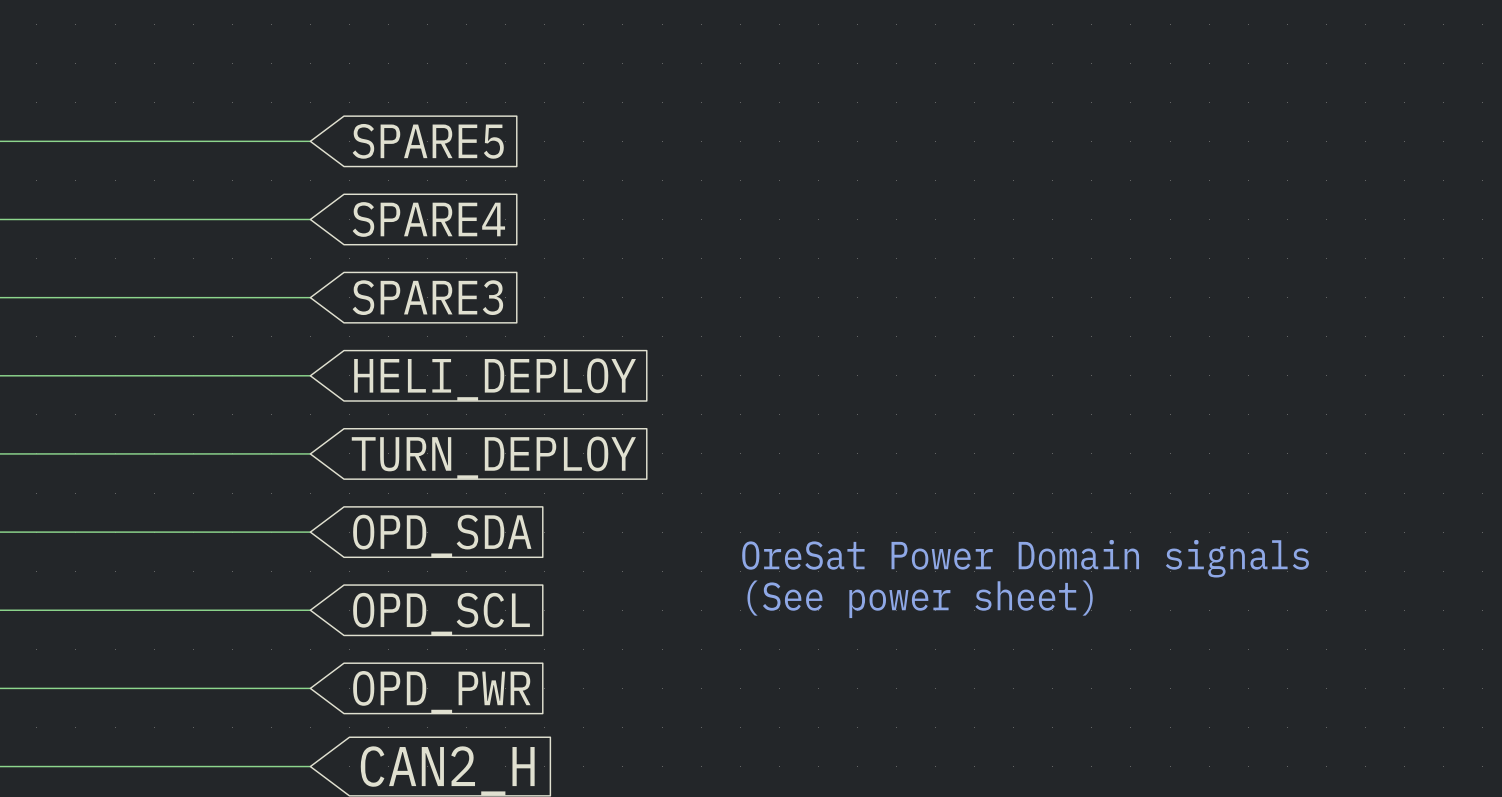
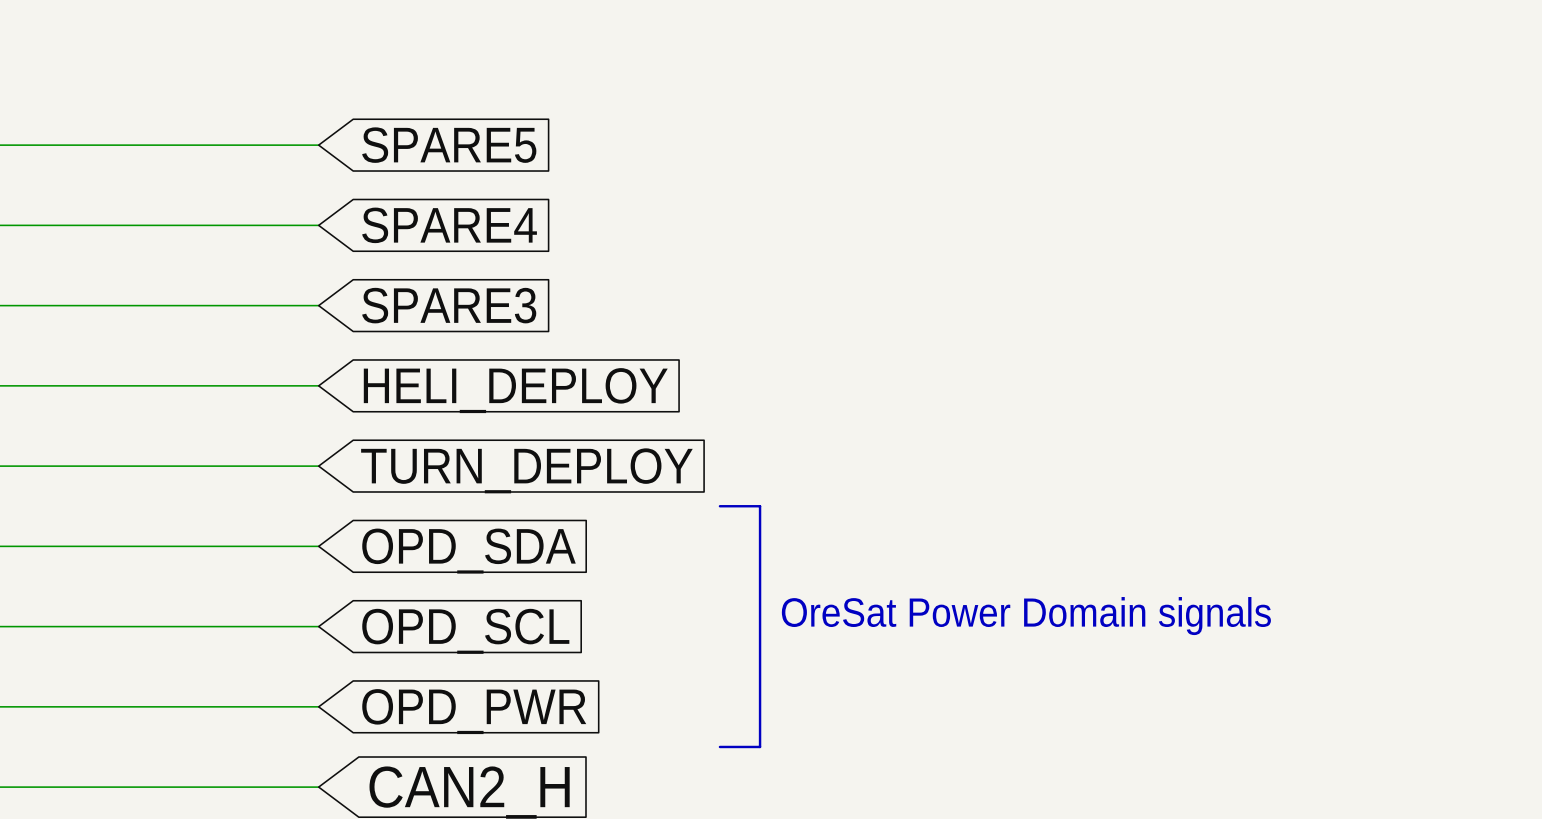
line: none -> (719, 506) (760, 506) (760, 746) (719, 746)
text position: OreSat Power Domain signals (1025, 558) -> OreSat Power Domain signals (1026, 616)
text: (See power sheet) (920, 599) -> none

